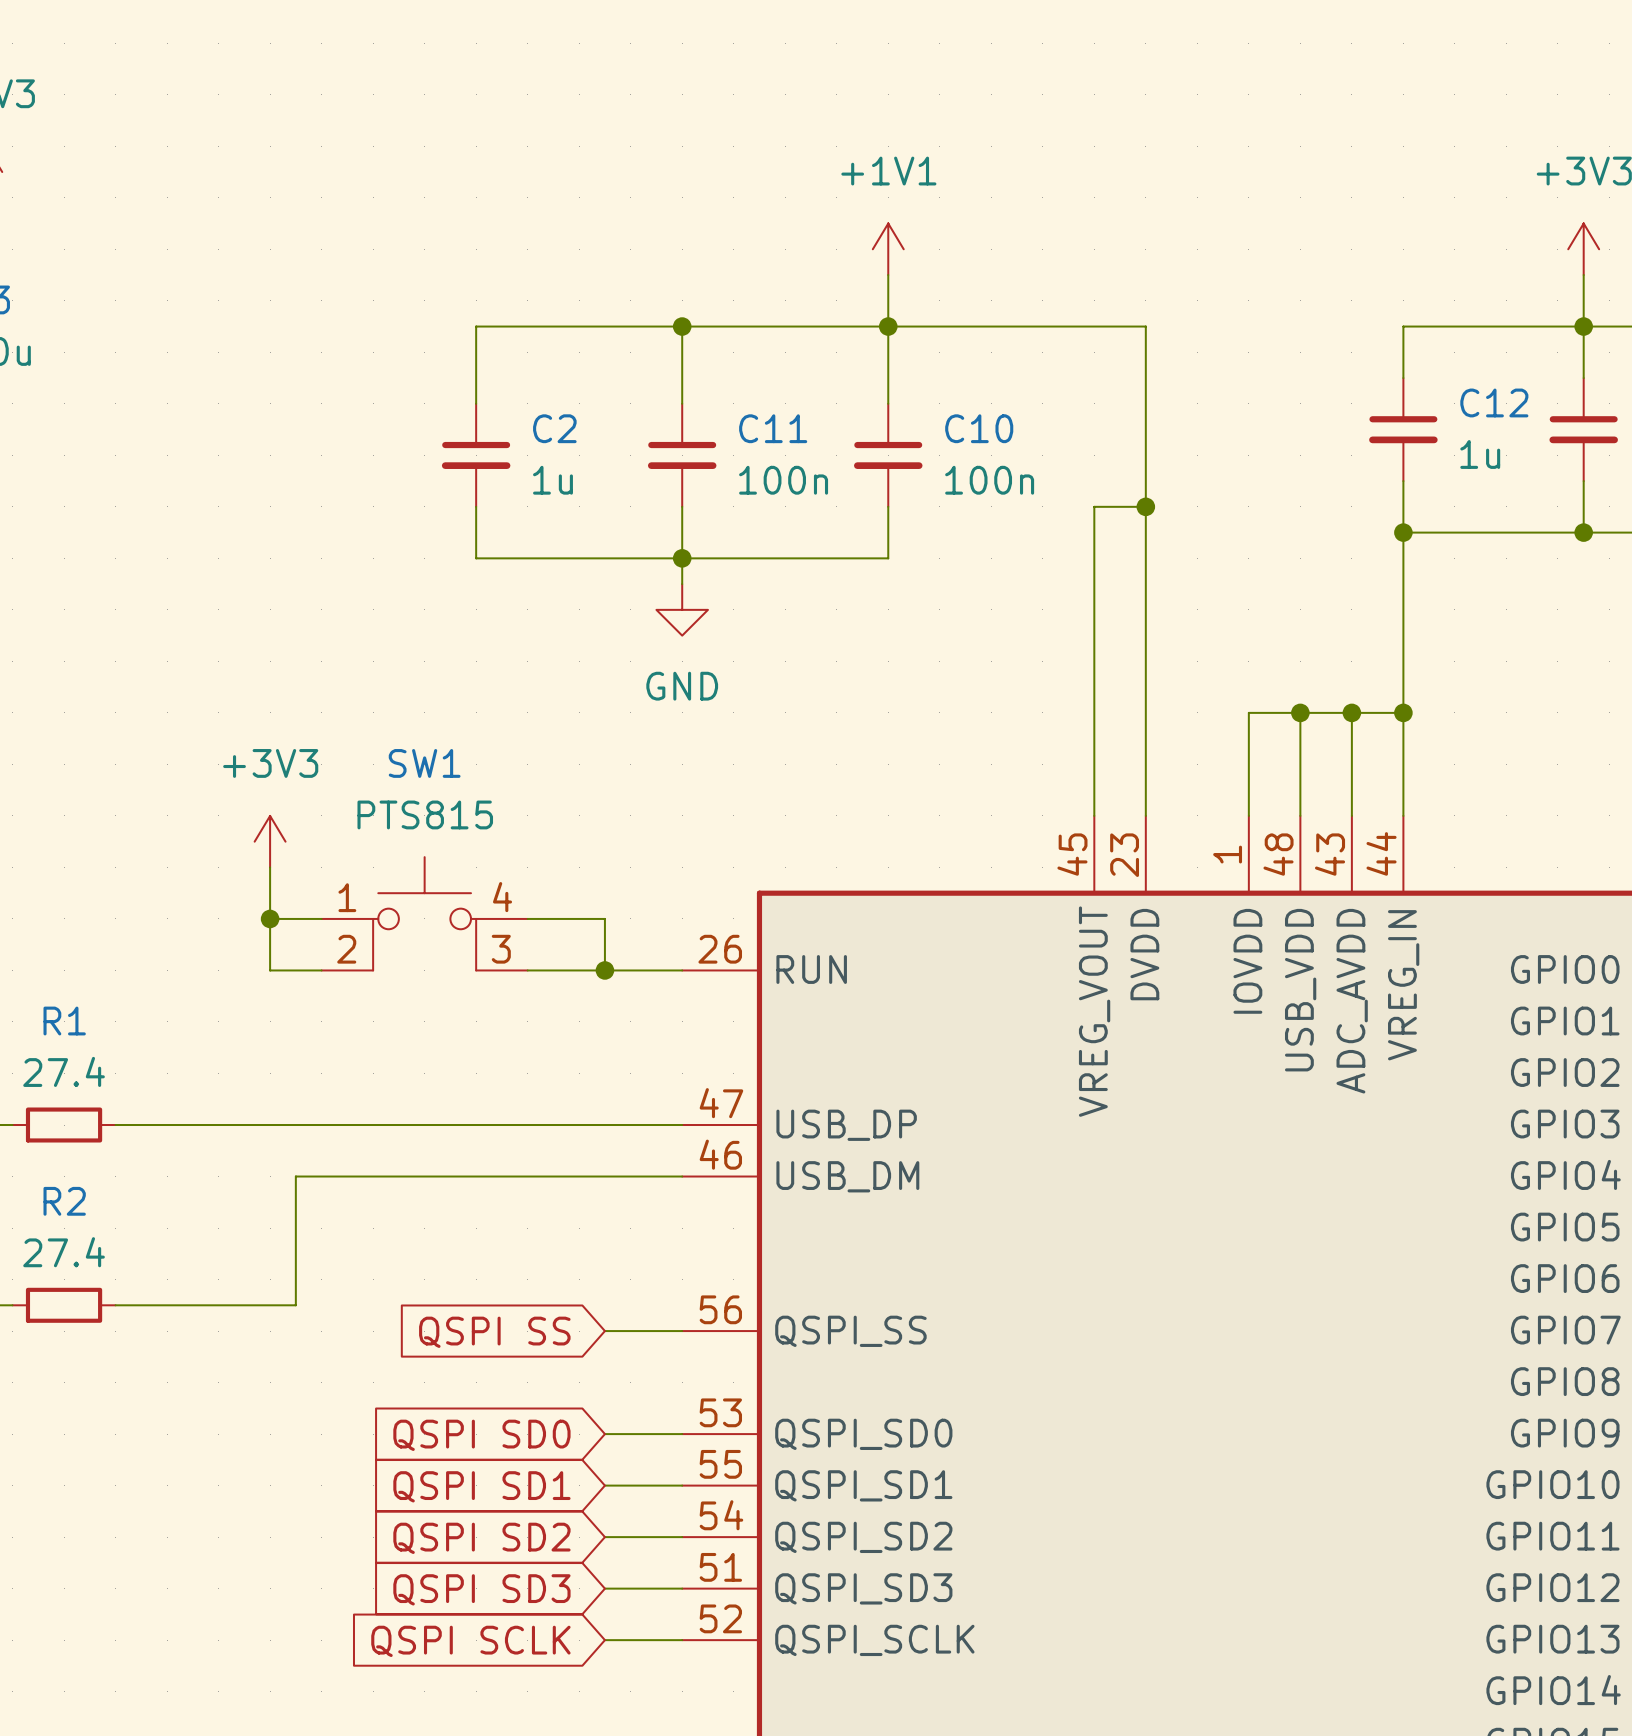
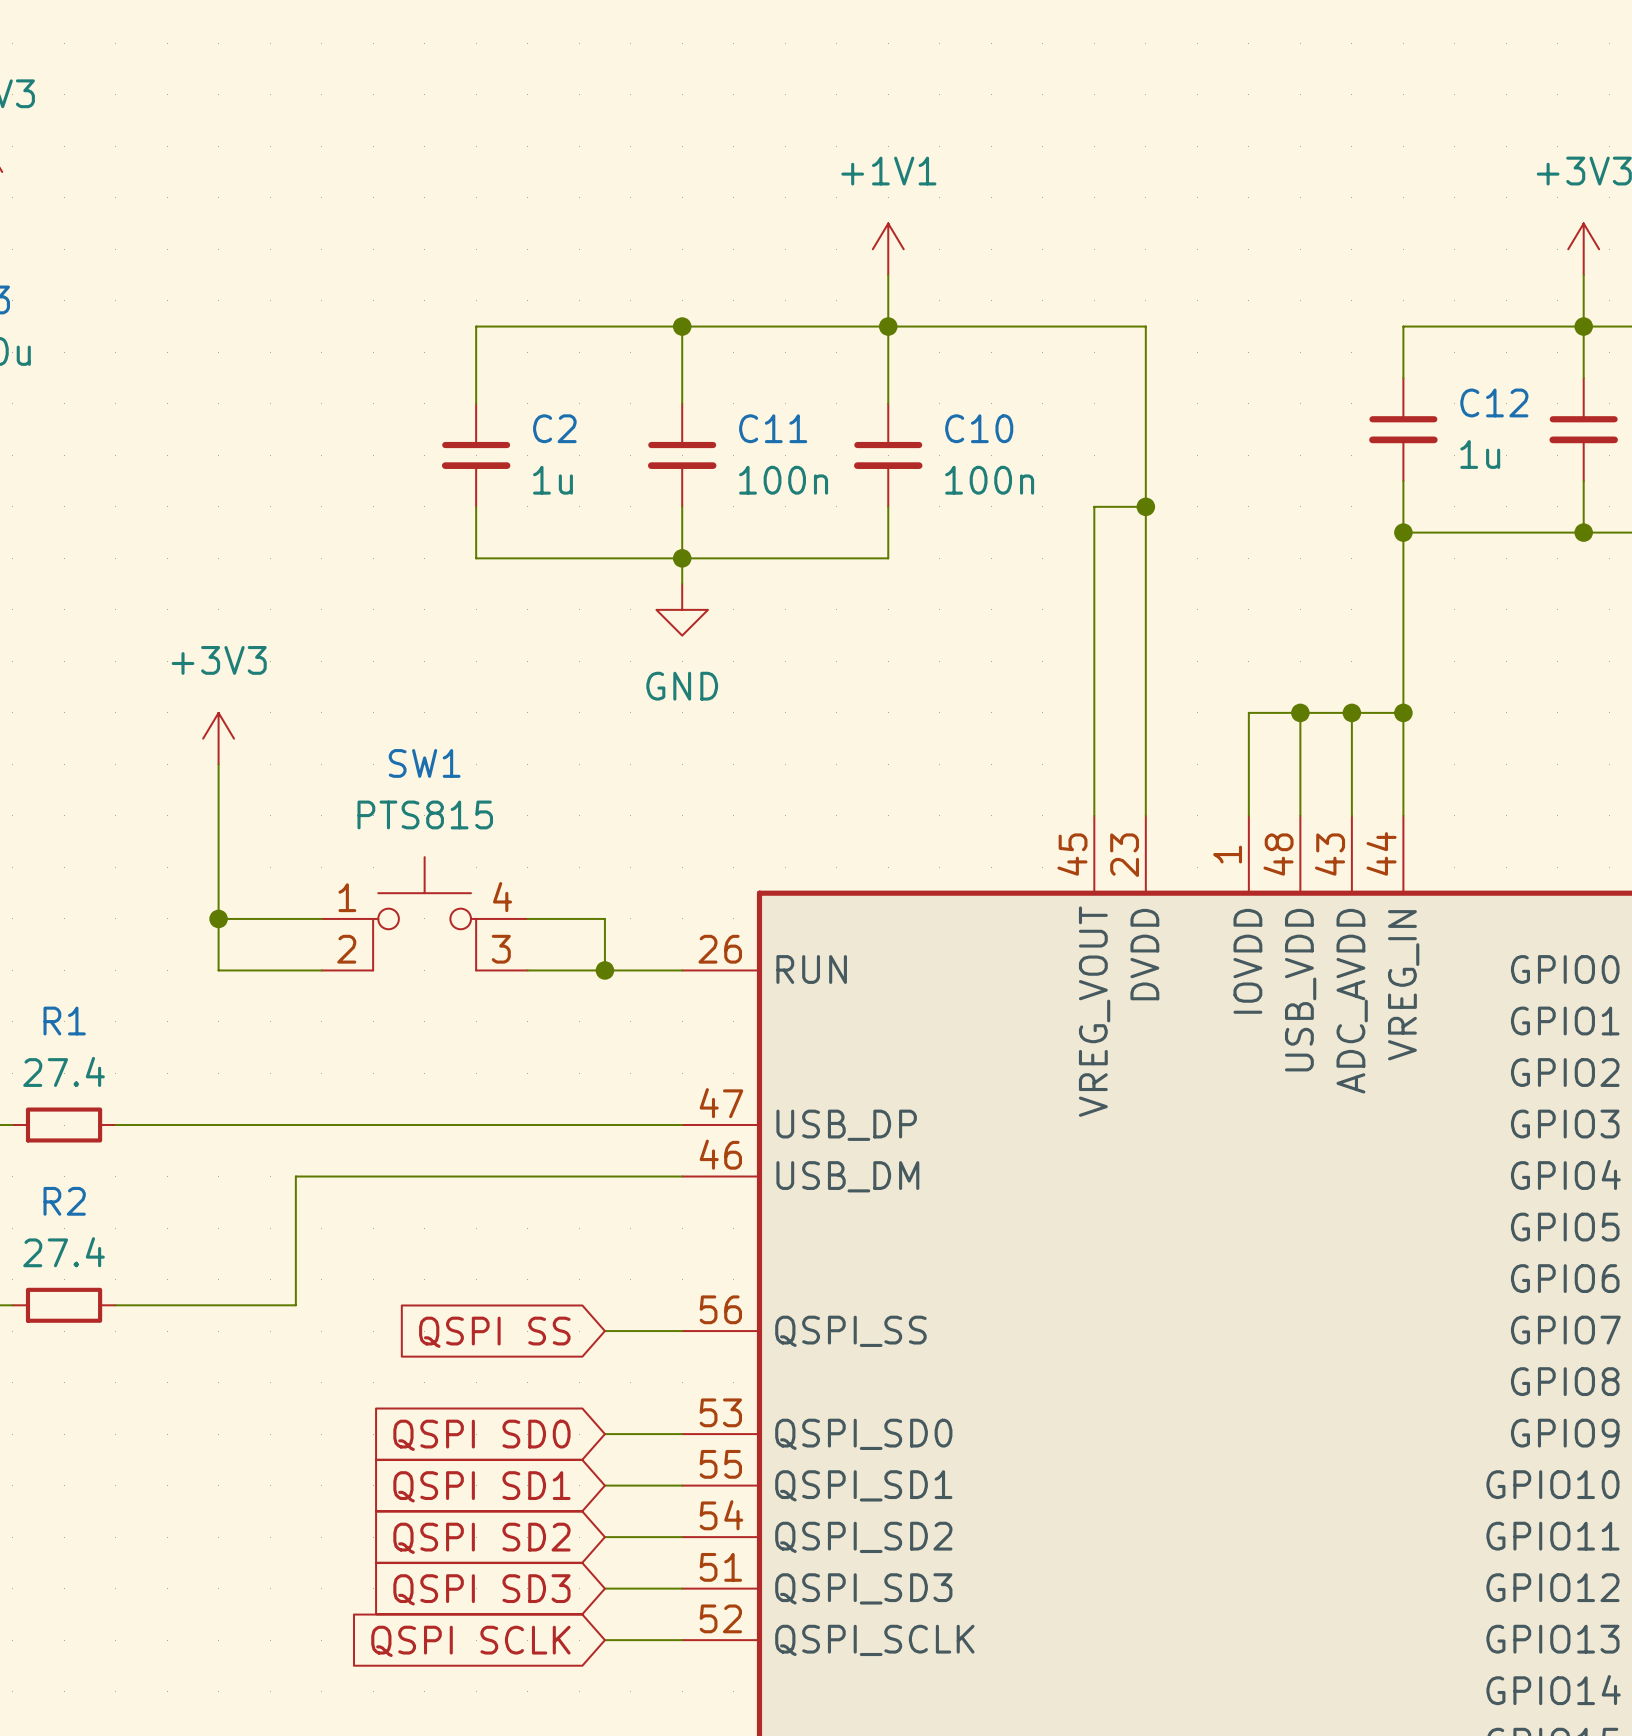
power symbol position: +3V3 (270, 841) -> +3V3 (218, 738)
wire: (270, 867) (270, 970) -> (218, 764) (218, 970) (270, 970)
wire: none -> (218, 918) (270, 918)
junction position: (270, 918) -> (218, 918)

